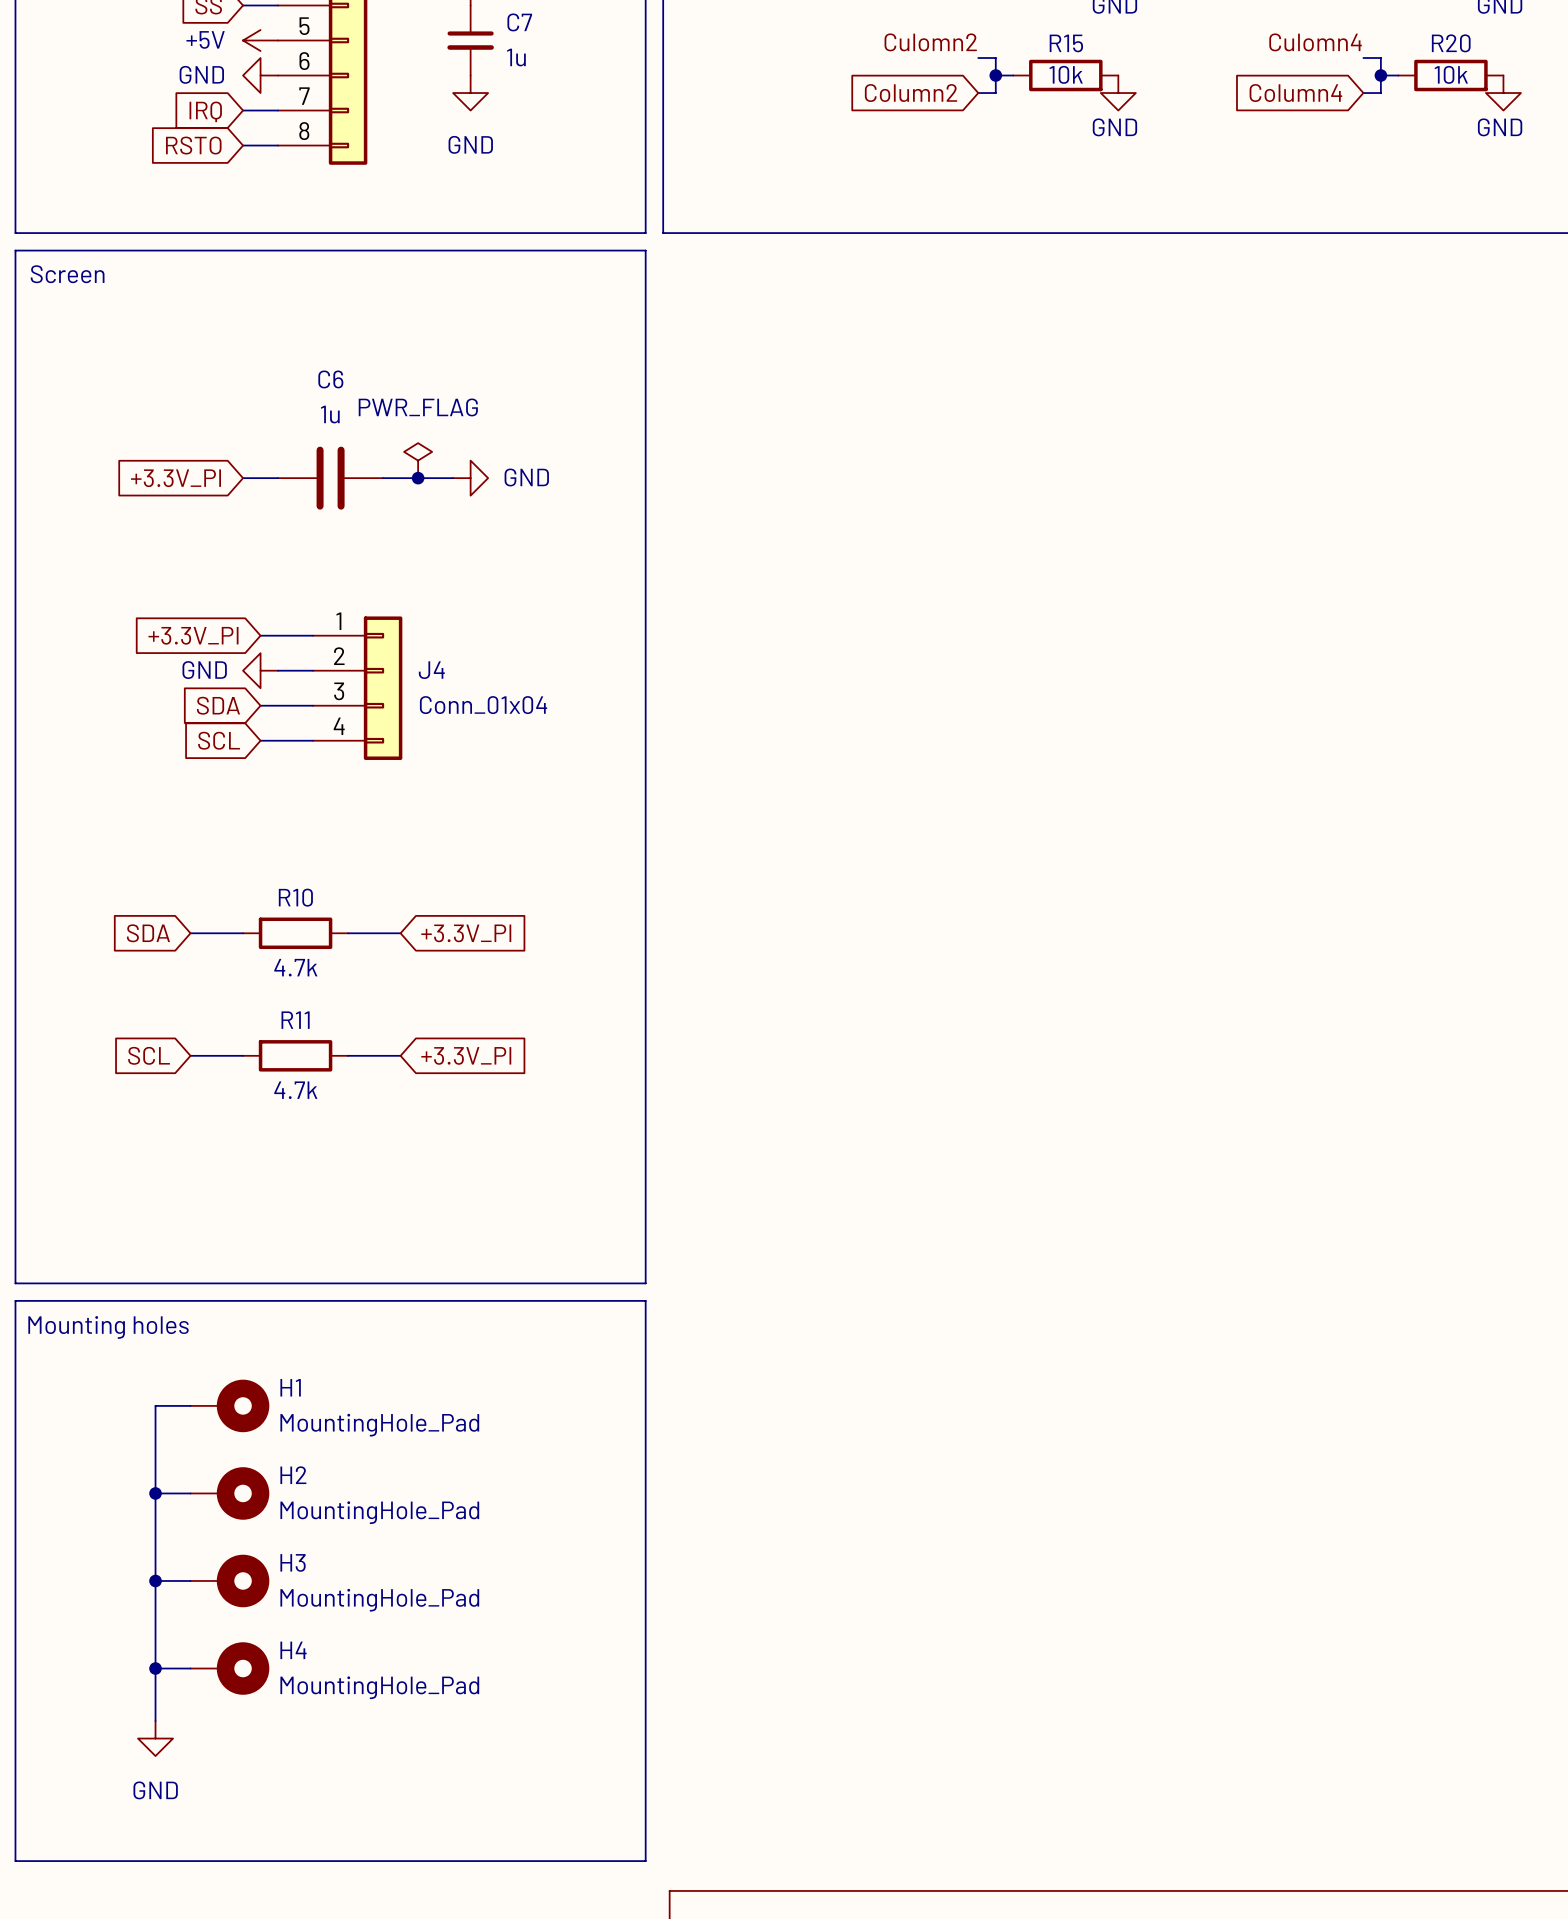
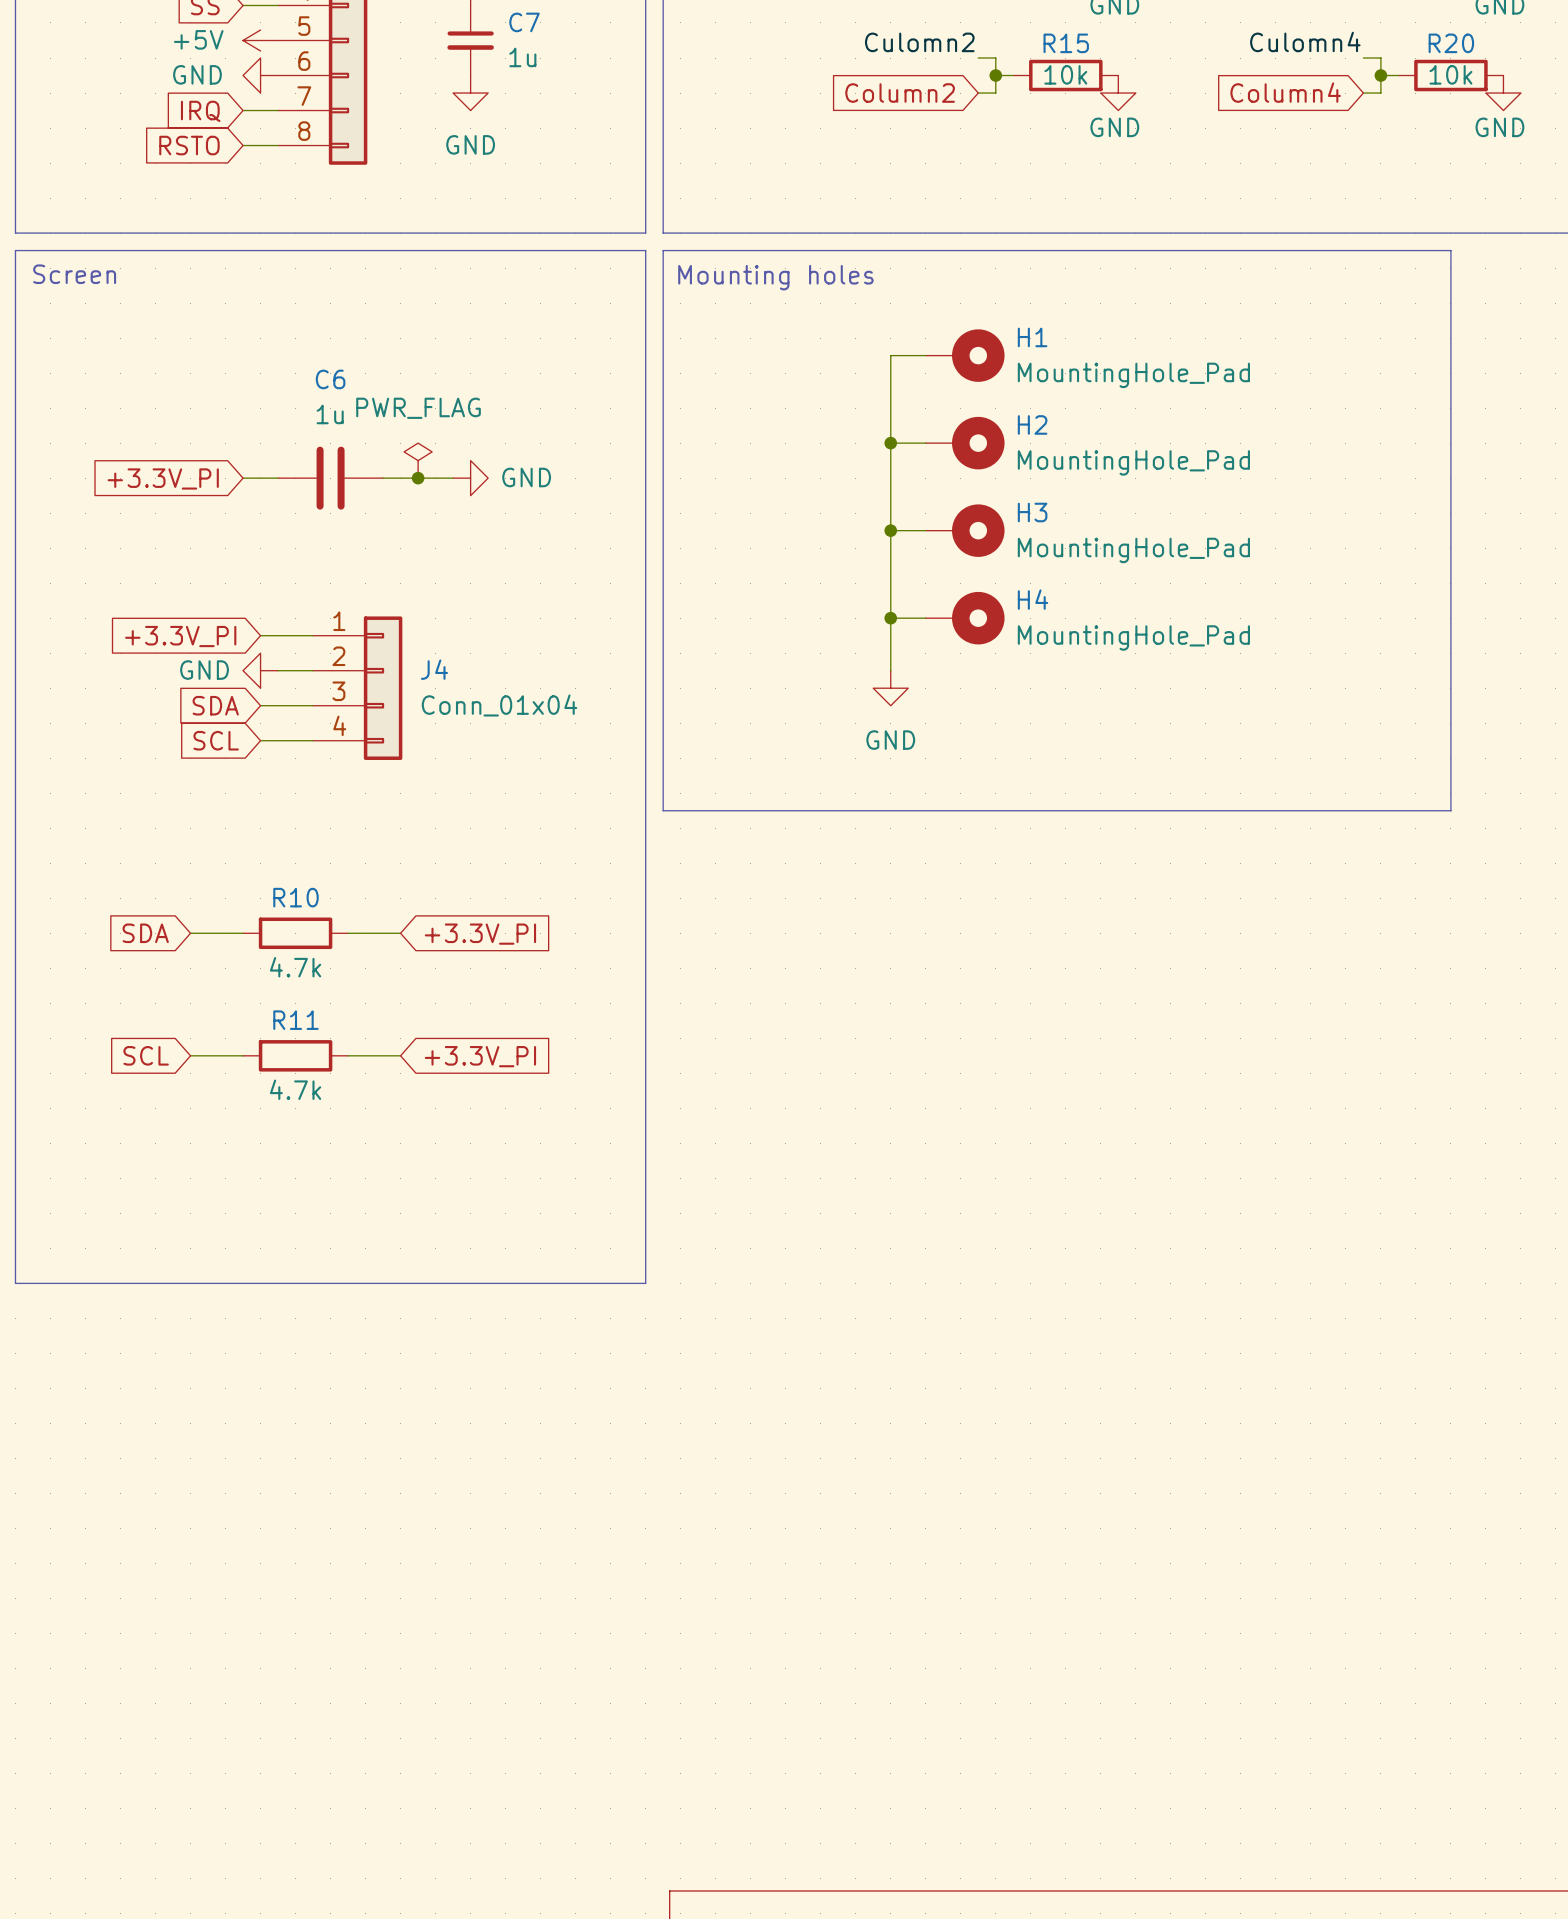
line: none -> (663, 250) (1450, 250) (1450, 810) (663, 810) (663, 250)
text: none -> Mounting holes (775, 277)
wire: none -> (925, 355) (890, 355) (890, 670)
wire: none -> (890, 443) (925, 443)
junction: none -> (890, 443)
wire: none -> (890, 530) (925, 530)
junction: none -> (890, 530)
wire: none -> (890, 618) (925, 618)
junction: none -> (890, 618)
power symbol: none -> GND (890, 688)
line: (15, 1300) (645, 1300) (645, 1861) (15, 1861) (15, 1300) -> none
text: Mounting holes (108, 1327) -> none
wire: (190, 1405) (155, 1405) (155, 1721) -> none
H1 position: (229, 1405) -> (965, 355)
wire: (155, 1493) (190, 1493) -> none
junction: (155, 1493) -> none
H2 position: (229, 1493) -> (965, 443)
wire: (155, 1580) (190, 1580) -> none
junction: (155, 1580) -> none
H3 position: (229, 1580) -> (965, 530)
wire: (155, 1668) (190, 1668) -> none
junction: (155, 1668) -> none
H4 position: (229, 1668) -> (965, 618)
power symbol: GND (155, 1738) -> none

